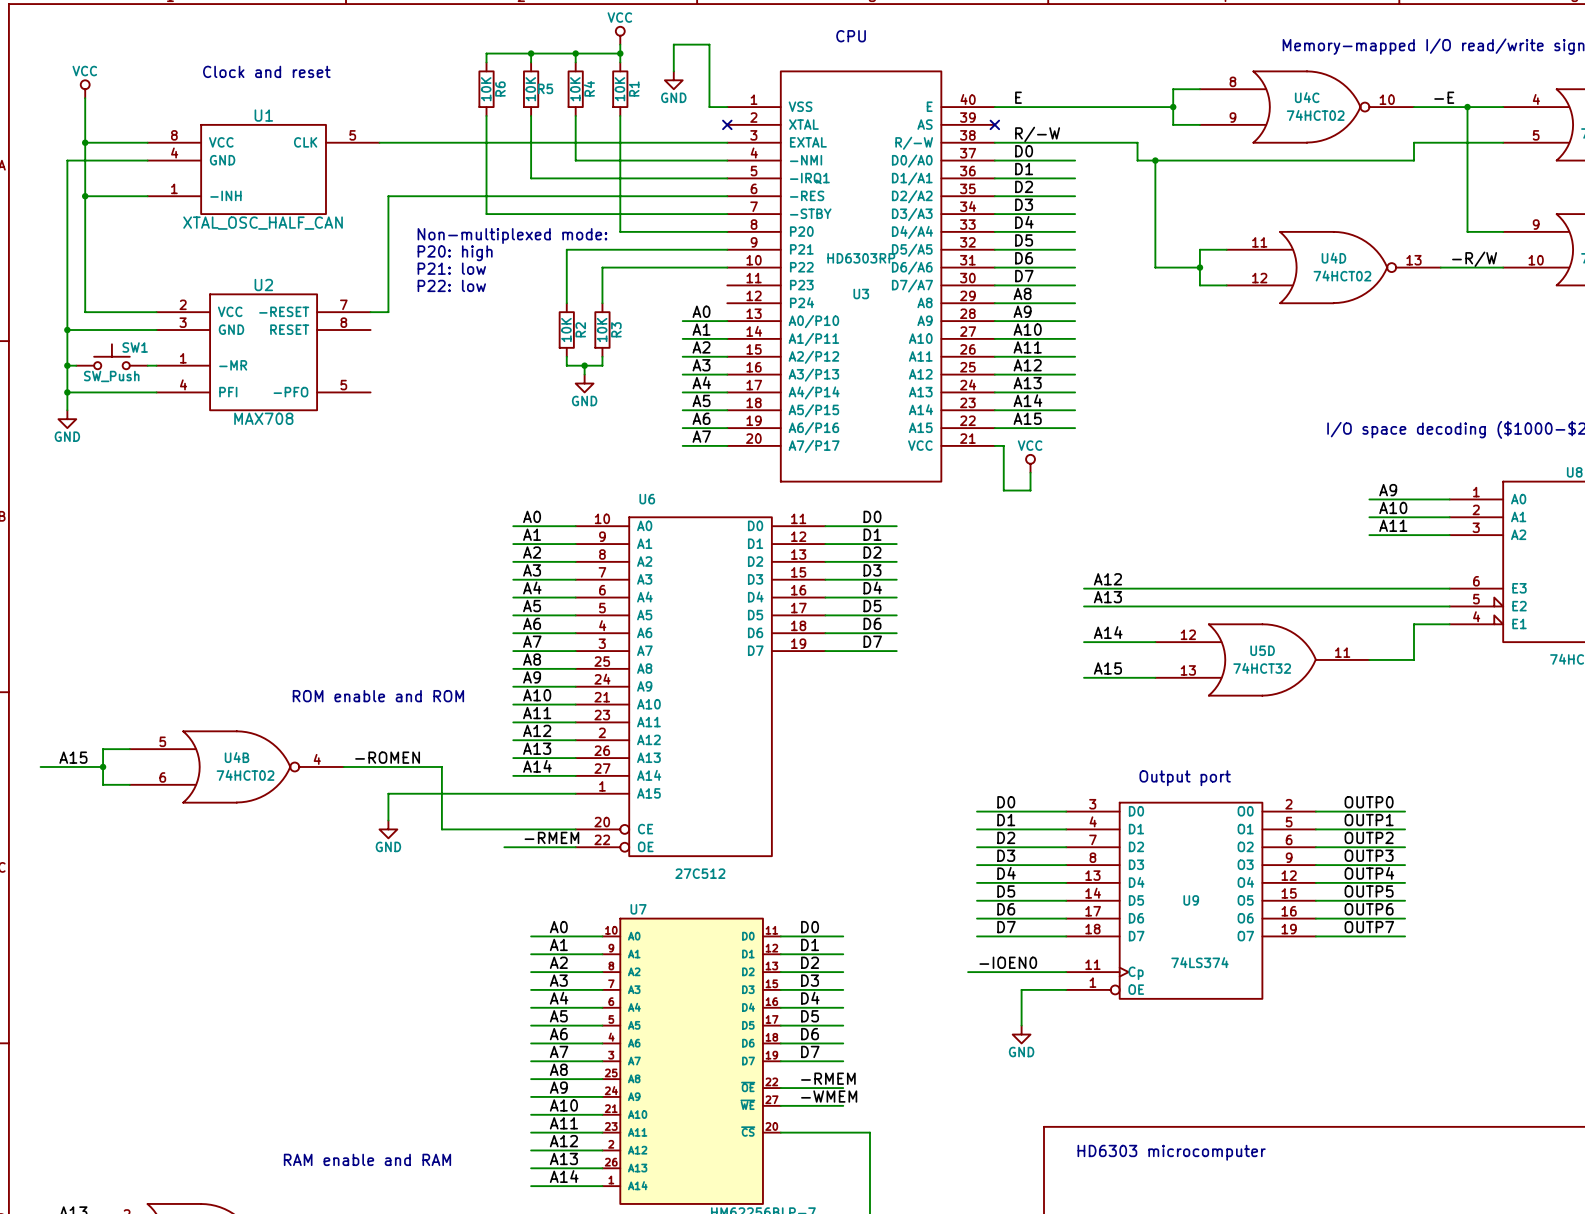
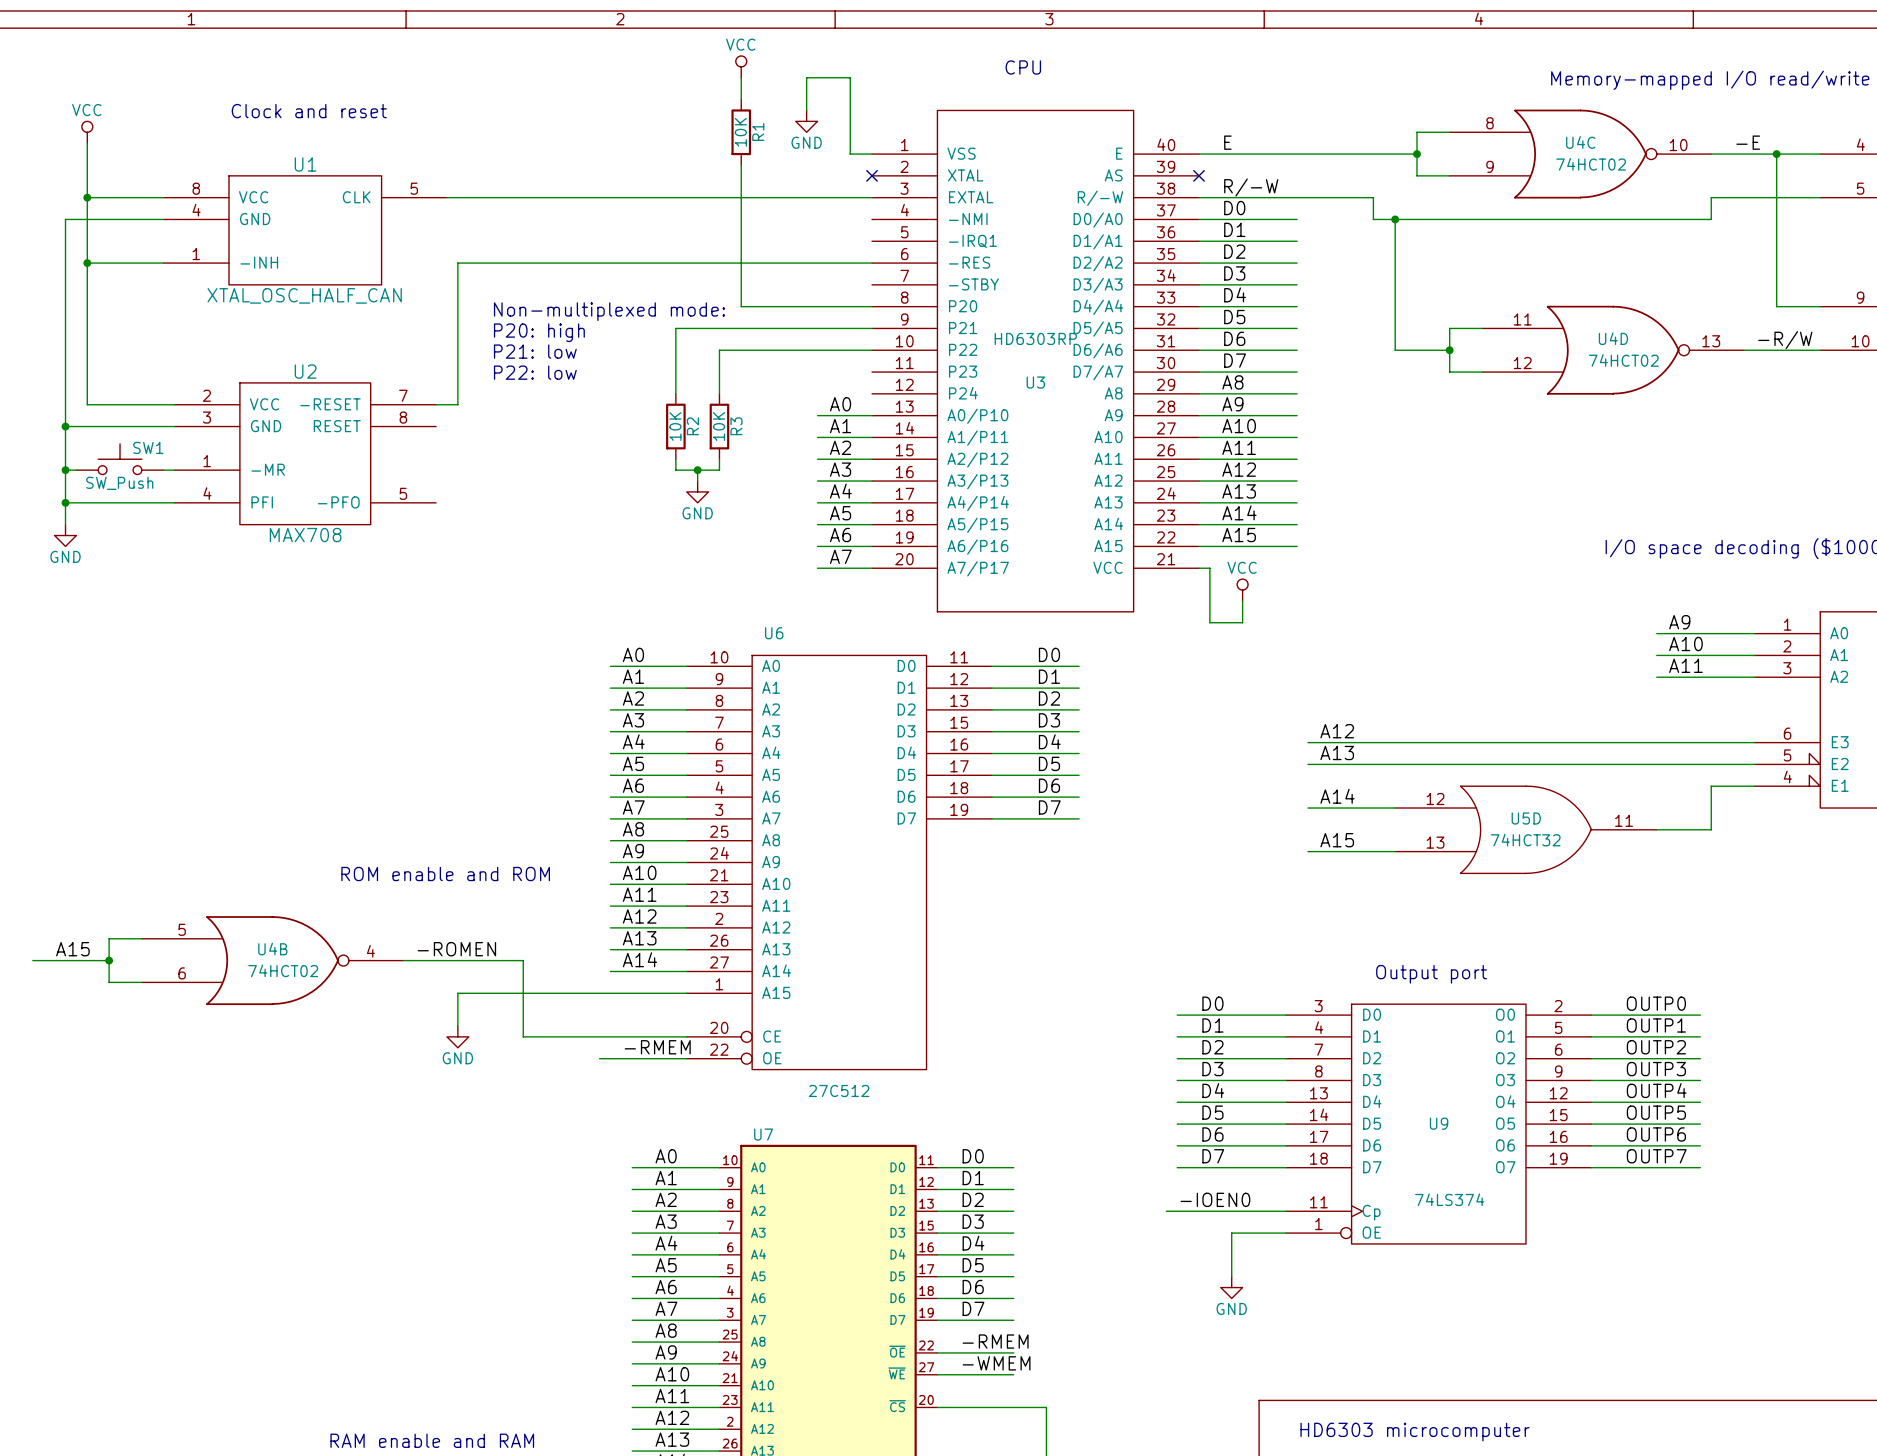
wire: (531, 53) (531, 62) -> none
junction: (531, 53) -> none
wire: (575, 53) (575, 62) -> none
junction: (575, 53) -> none
wire: (620, 53) (486, 53) (486, 62) -> none
junction: (620, 53) -> none
R6: 10K (486, 89) -> none
R5: 10K (531, 89) -> none
R4: 10K (575, 89) -> none
wire: (486, 115) (486, 214) (727, 214) -> none
wire: (531, 115) (531, 178) (727, 178) -> none
wire: (575, 115) (575, 160) (727, 160) -> none

